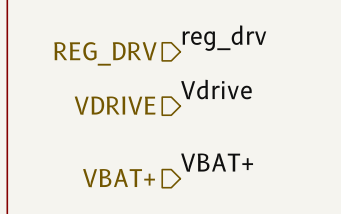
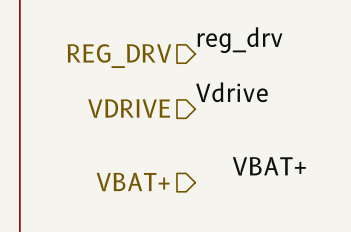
label position: VBAT+ (217, 162) -> VBAT+ (269, 166)

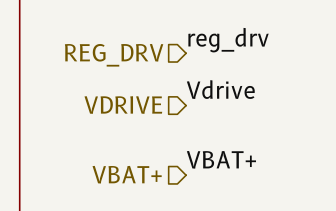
label position: VBAT+ (269, 166) -> VBAT+ (221, 159)

